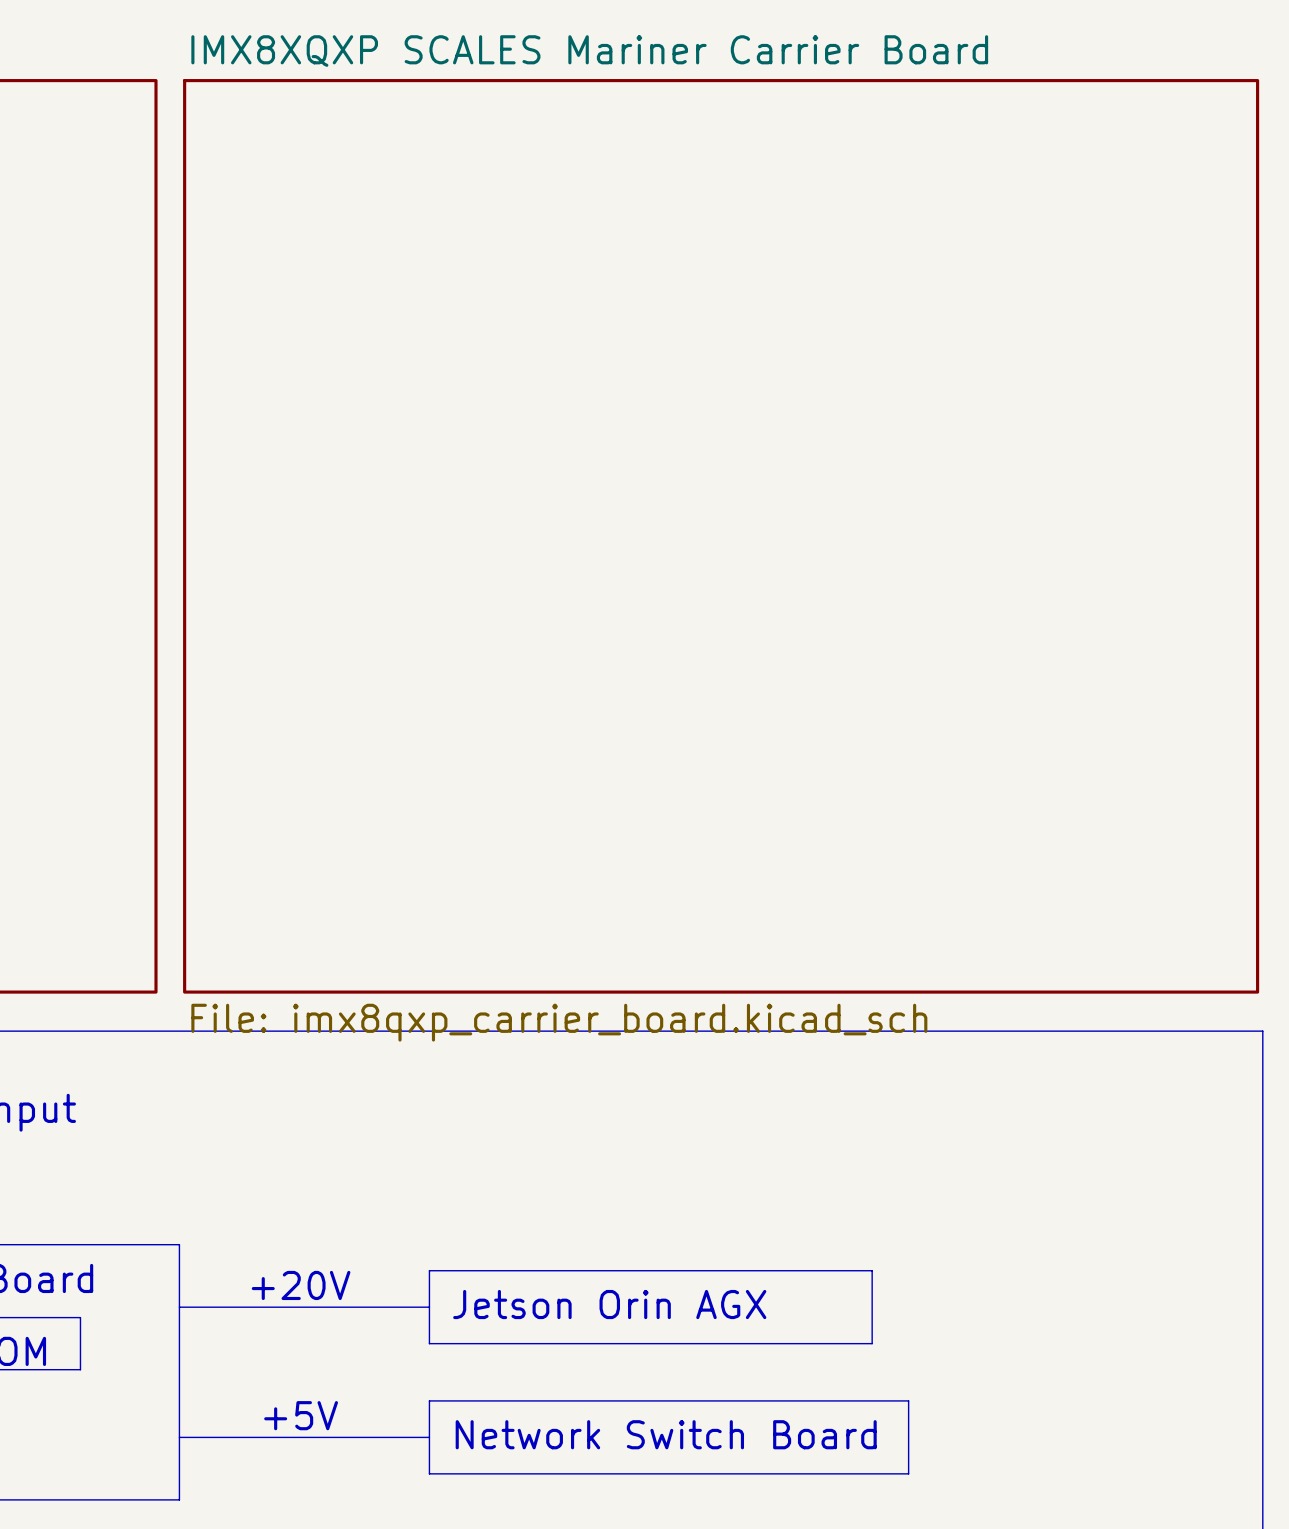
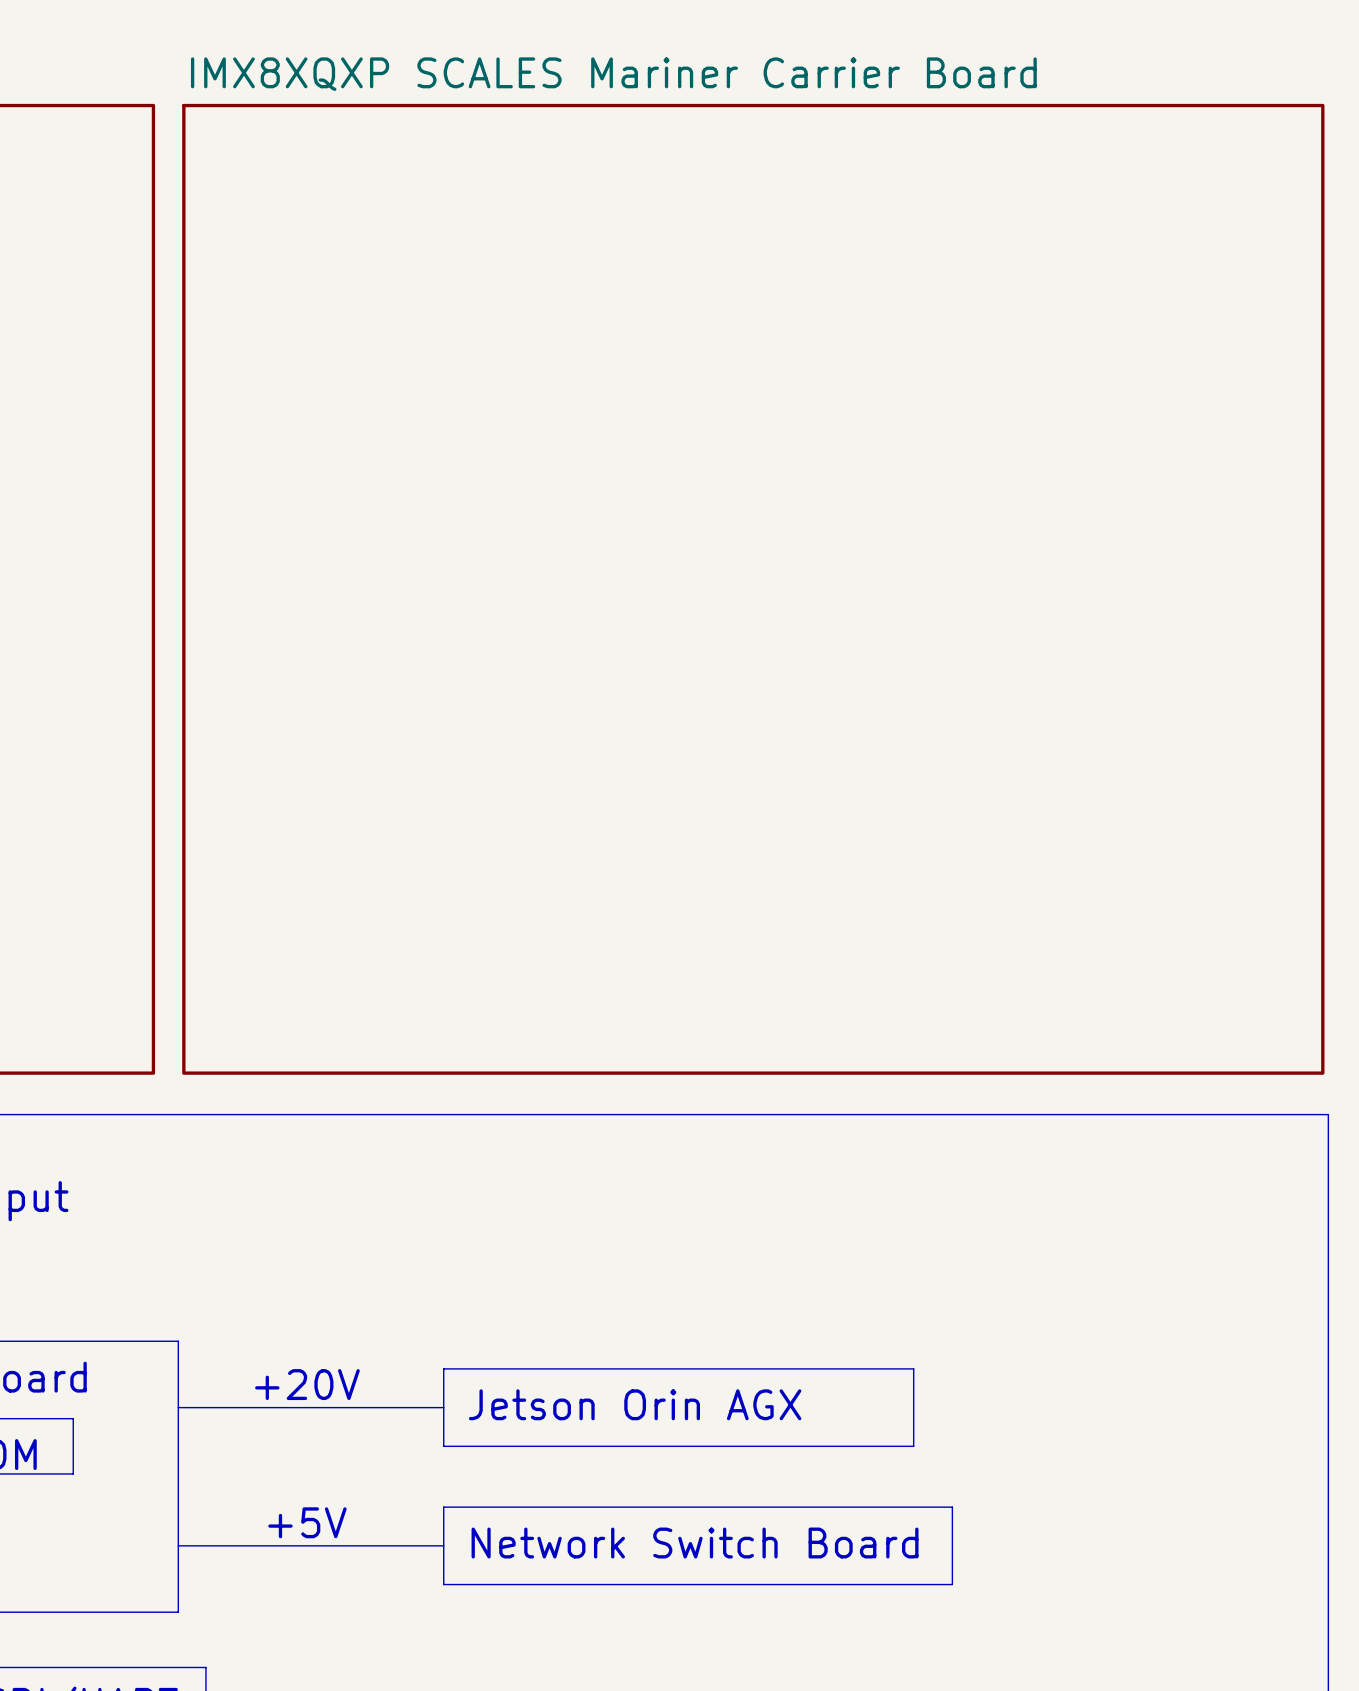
sheet IMX8XQXP SCALES Mariner Carrier Board value: File: imx8qxp_carrier_board.kicad_sch (559, 1022) -> none

